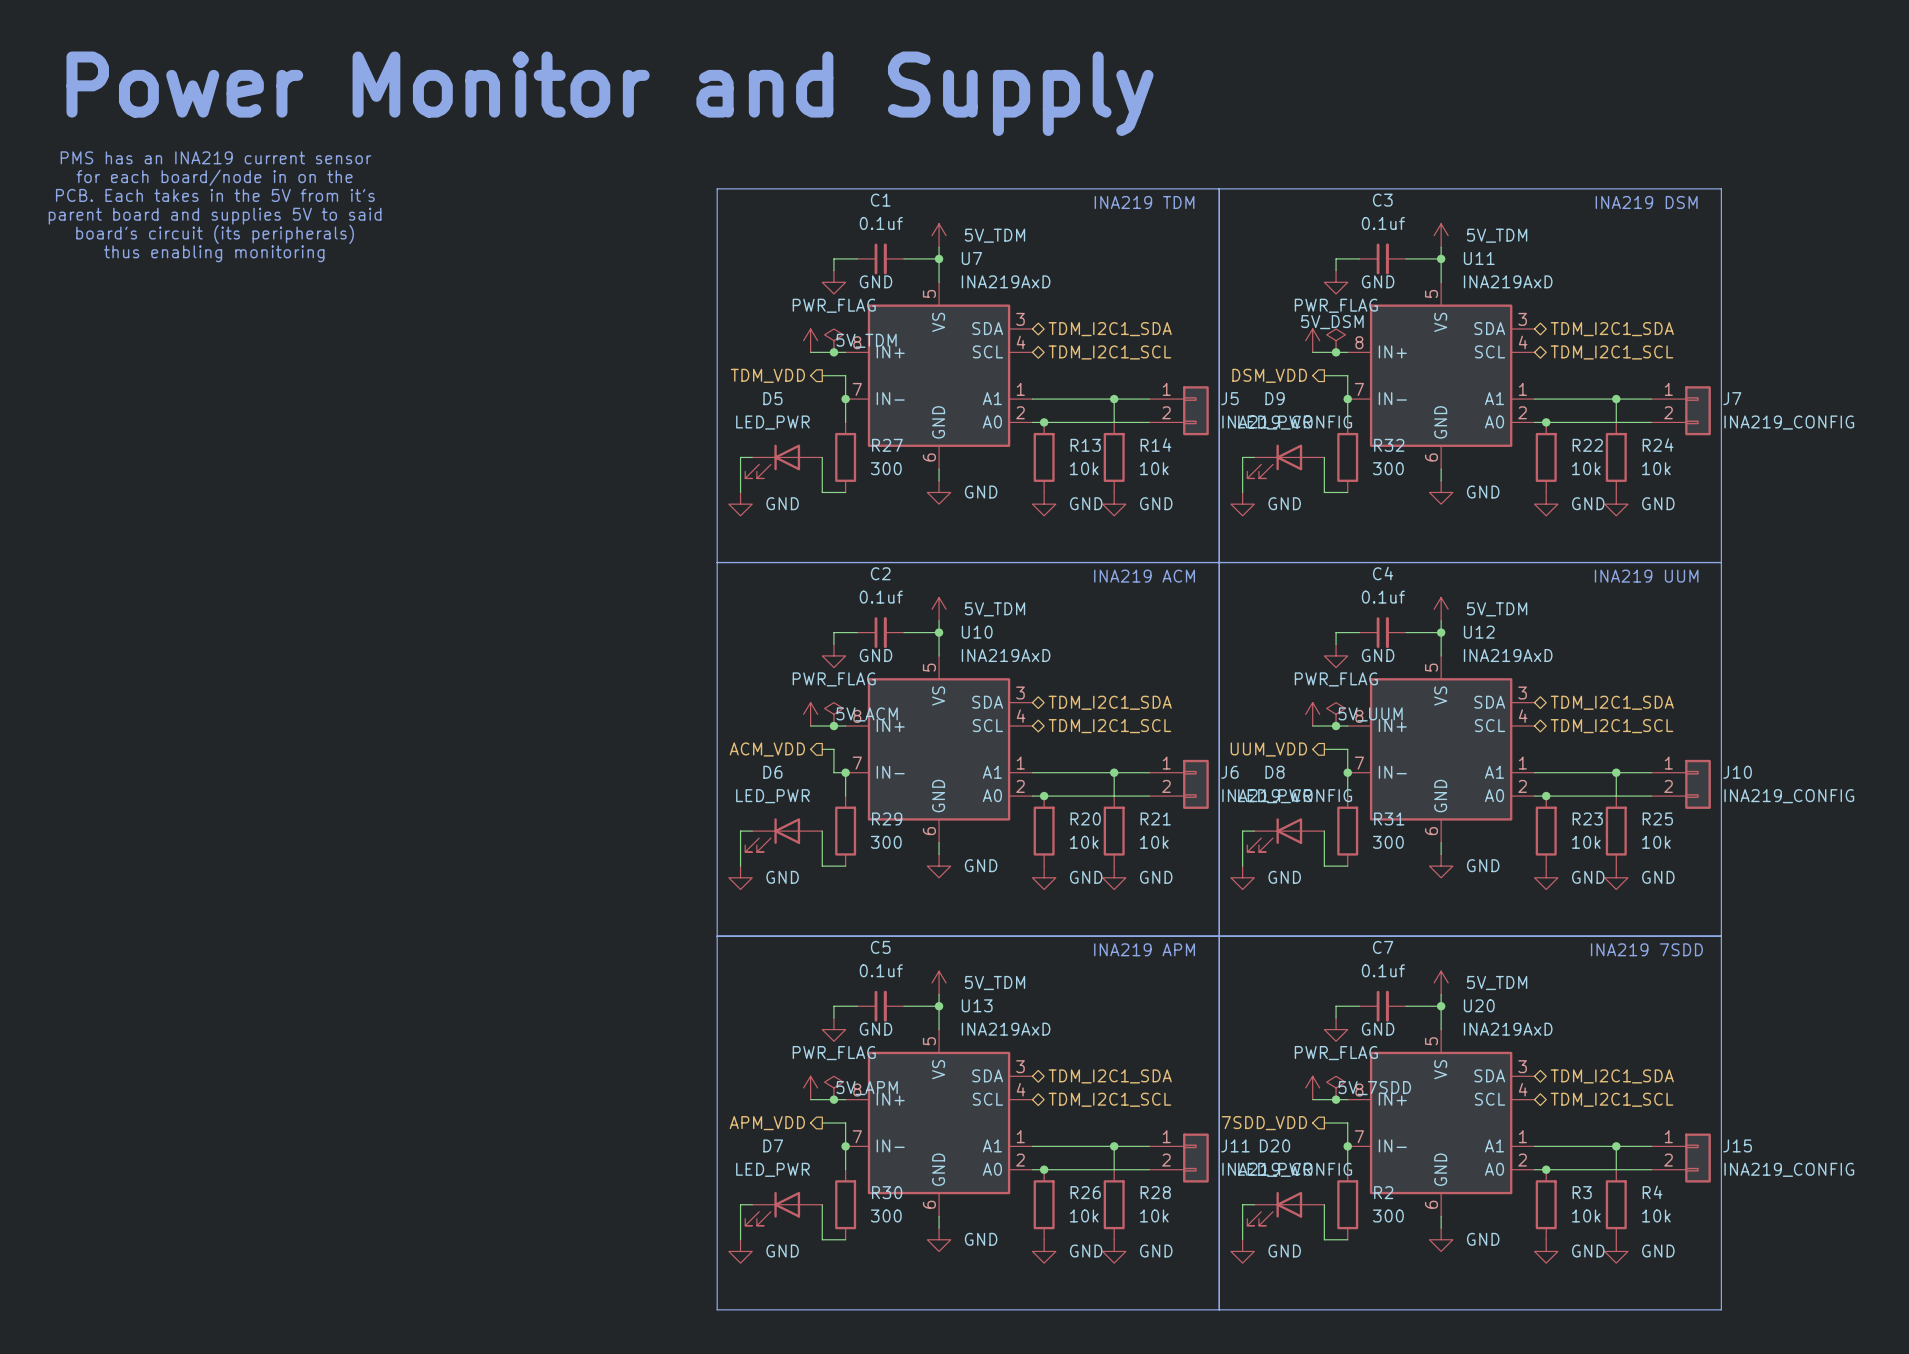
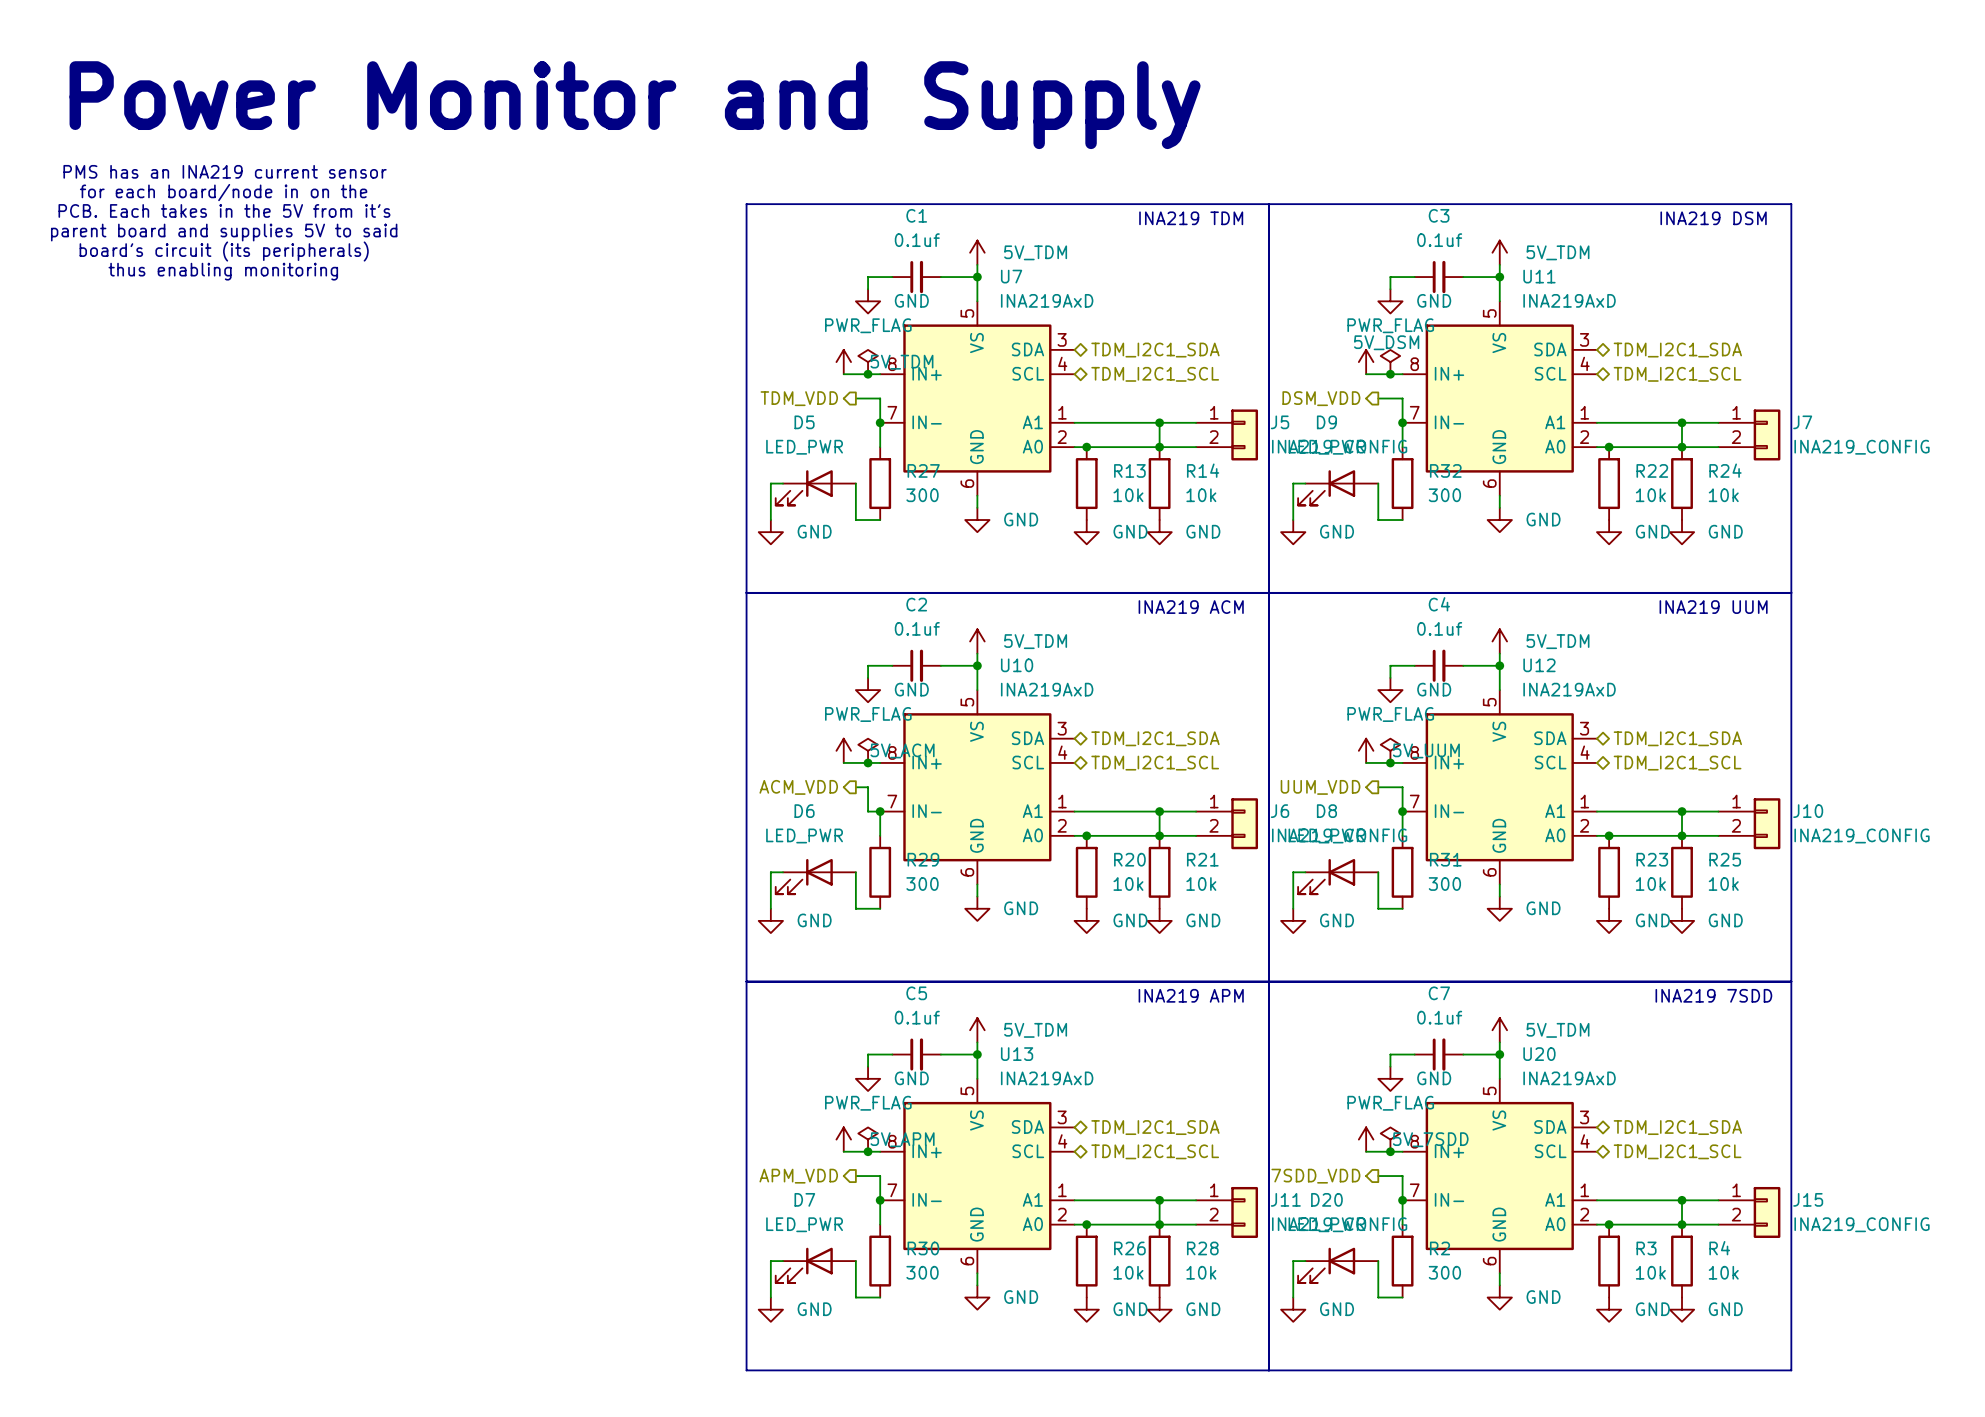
junction: none -> (1159, 447)
junction: none -> (1682, 447)
junction: none -> (1159, 835)
junction: none -> (1682, 835)
junction: none -> (1159, 1224)
junction: none -> (1682, 1224)

